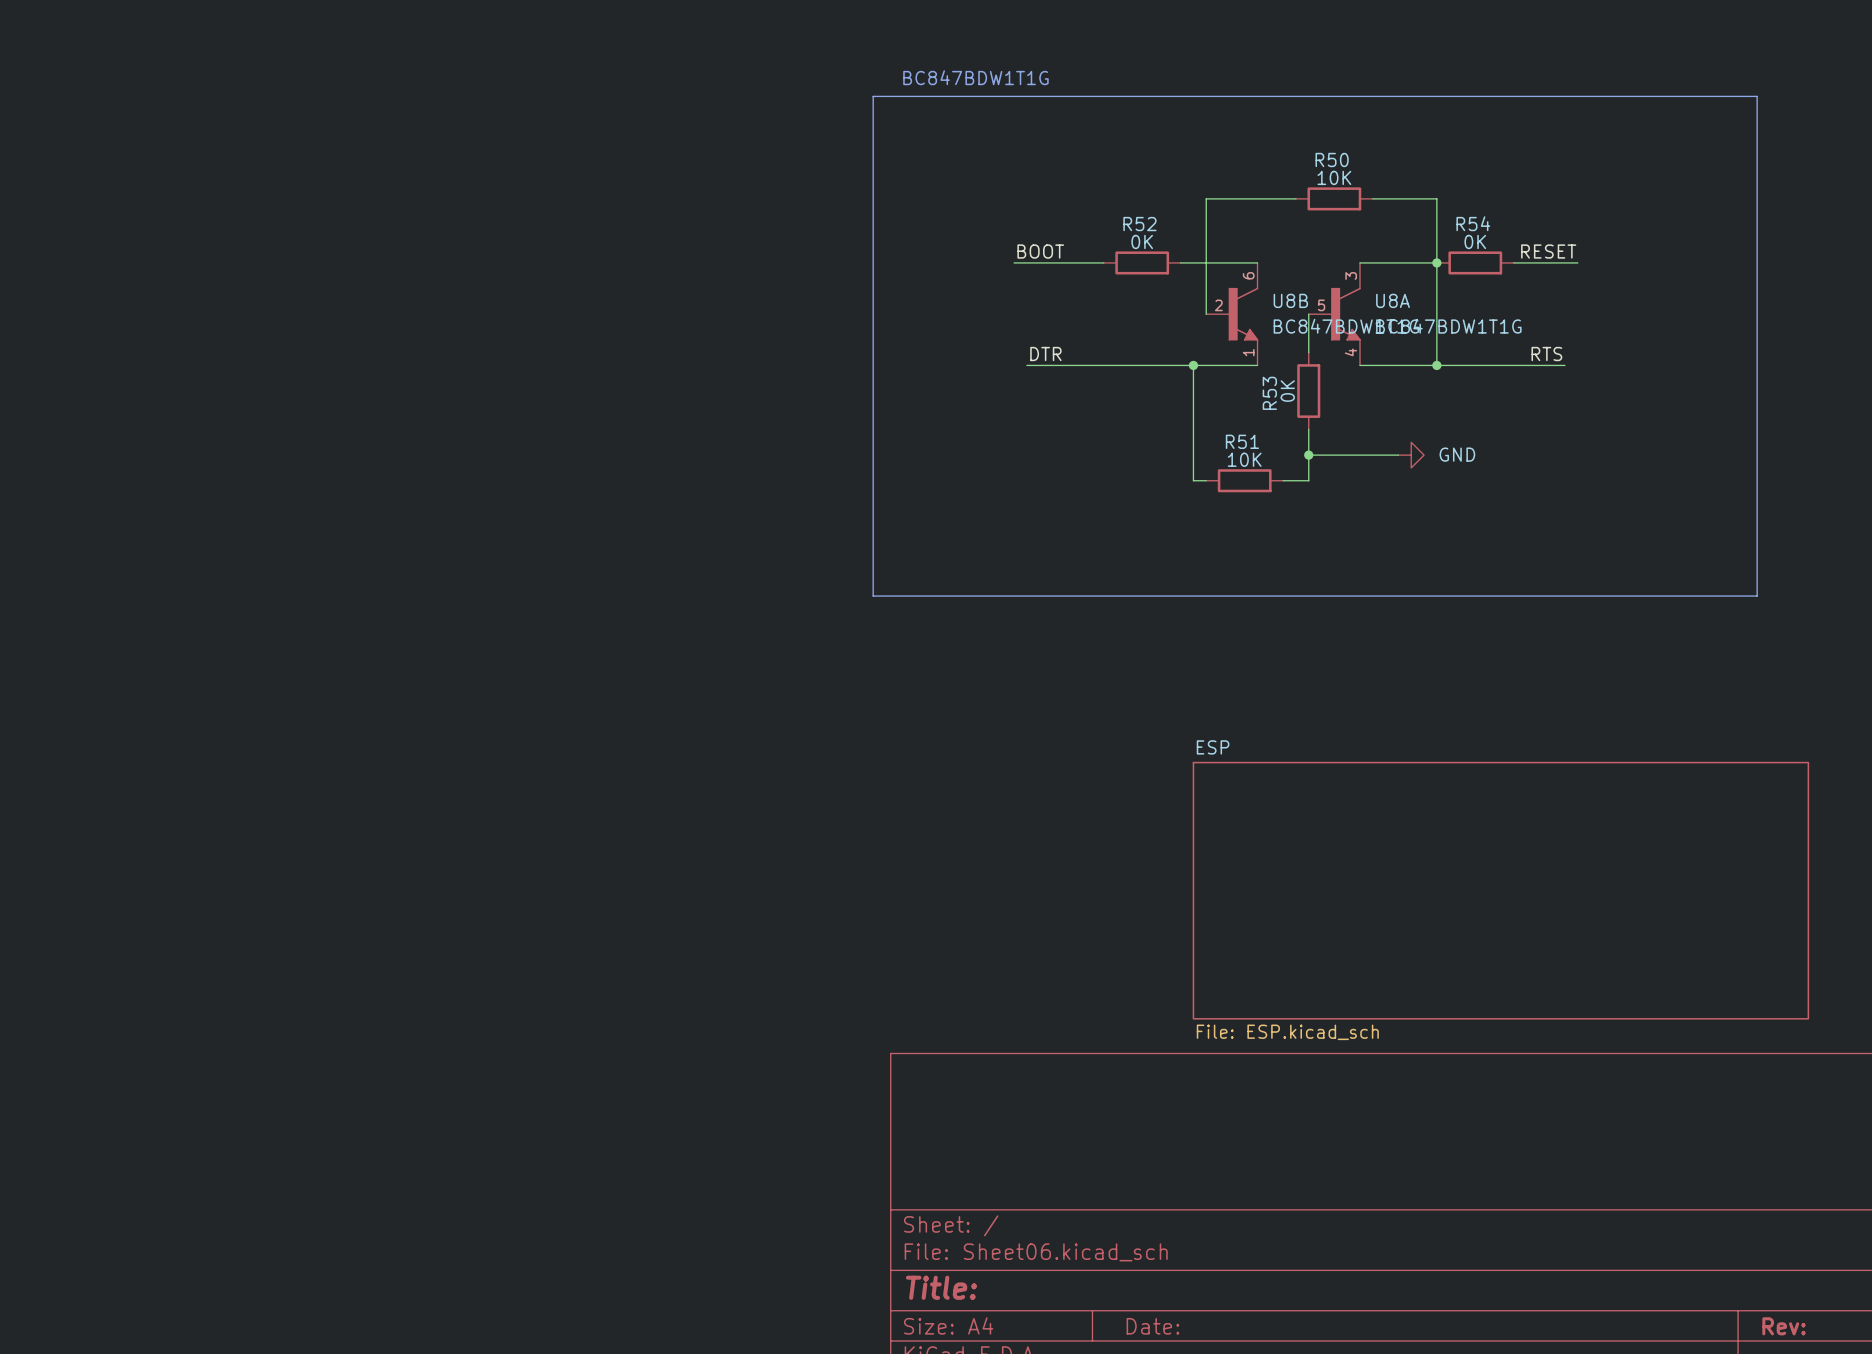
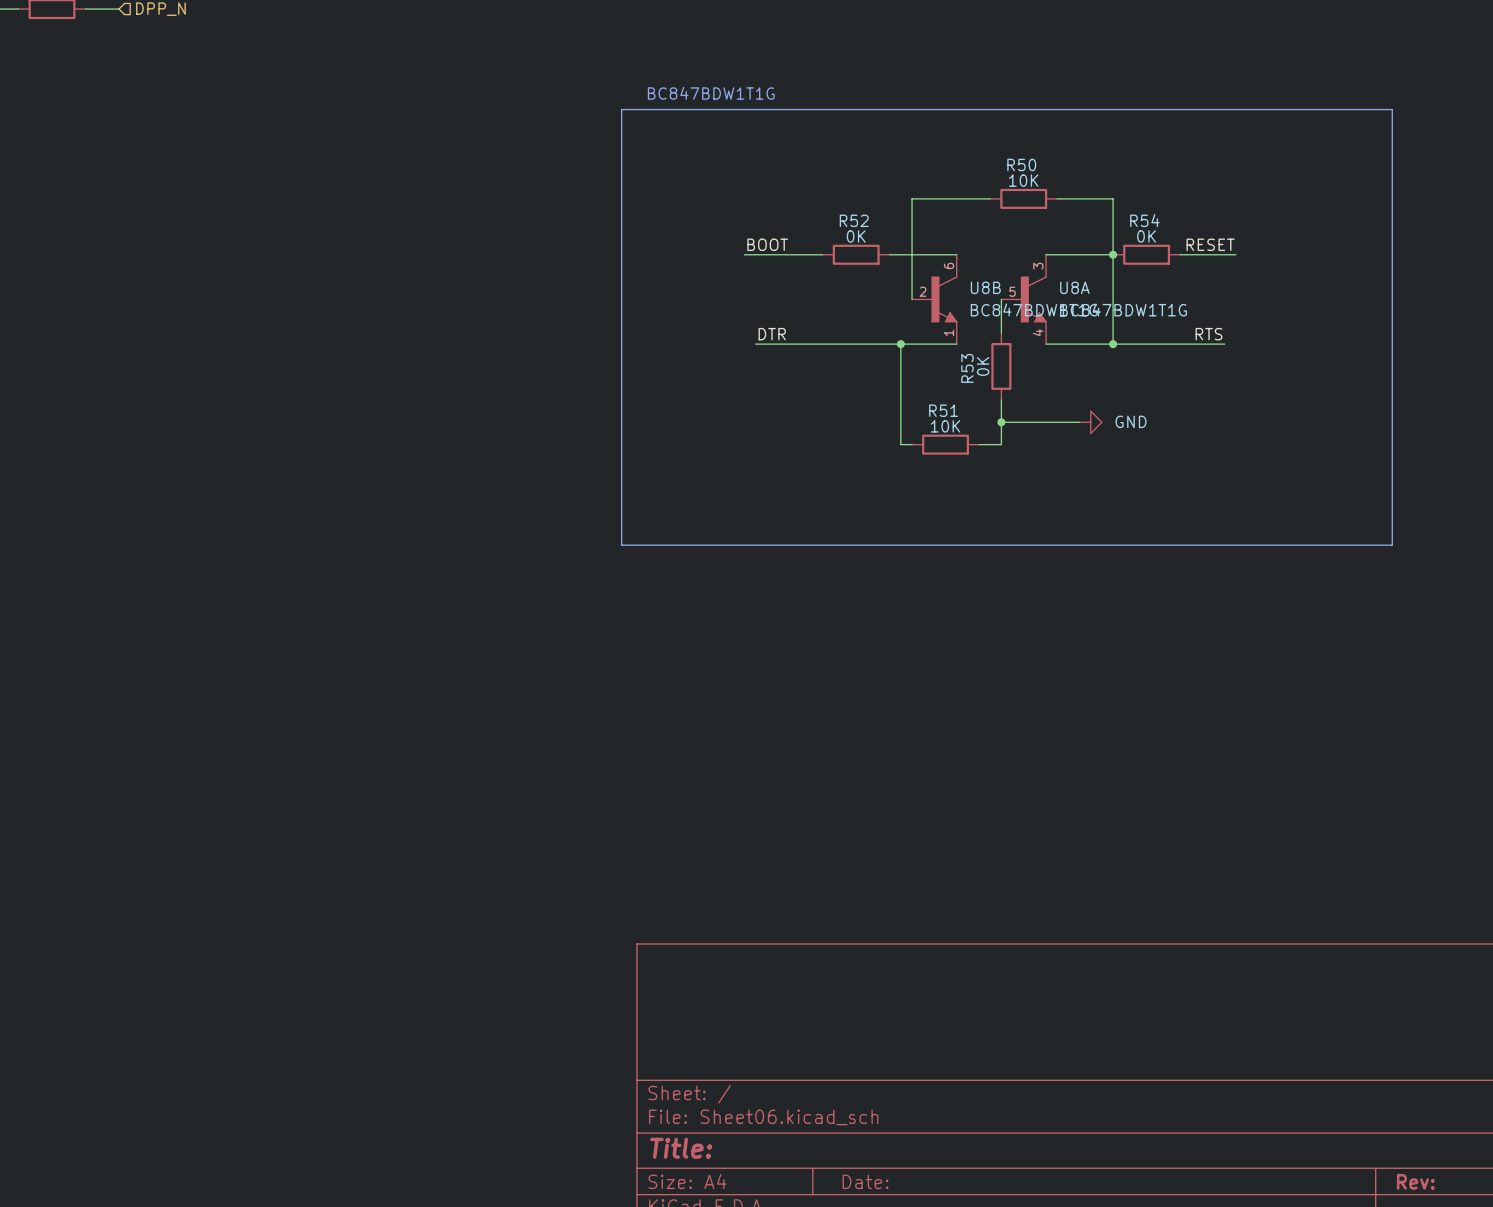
sheet ESP: File: ESP.kicad_sch (1500, 890) -> none

